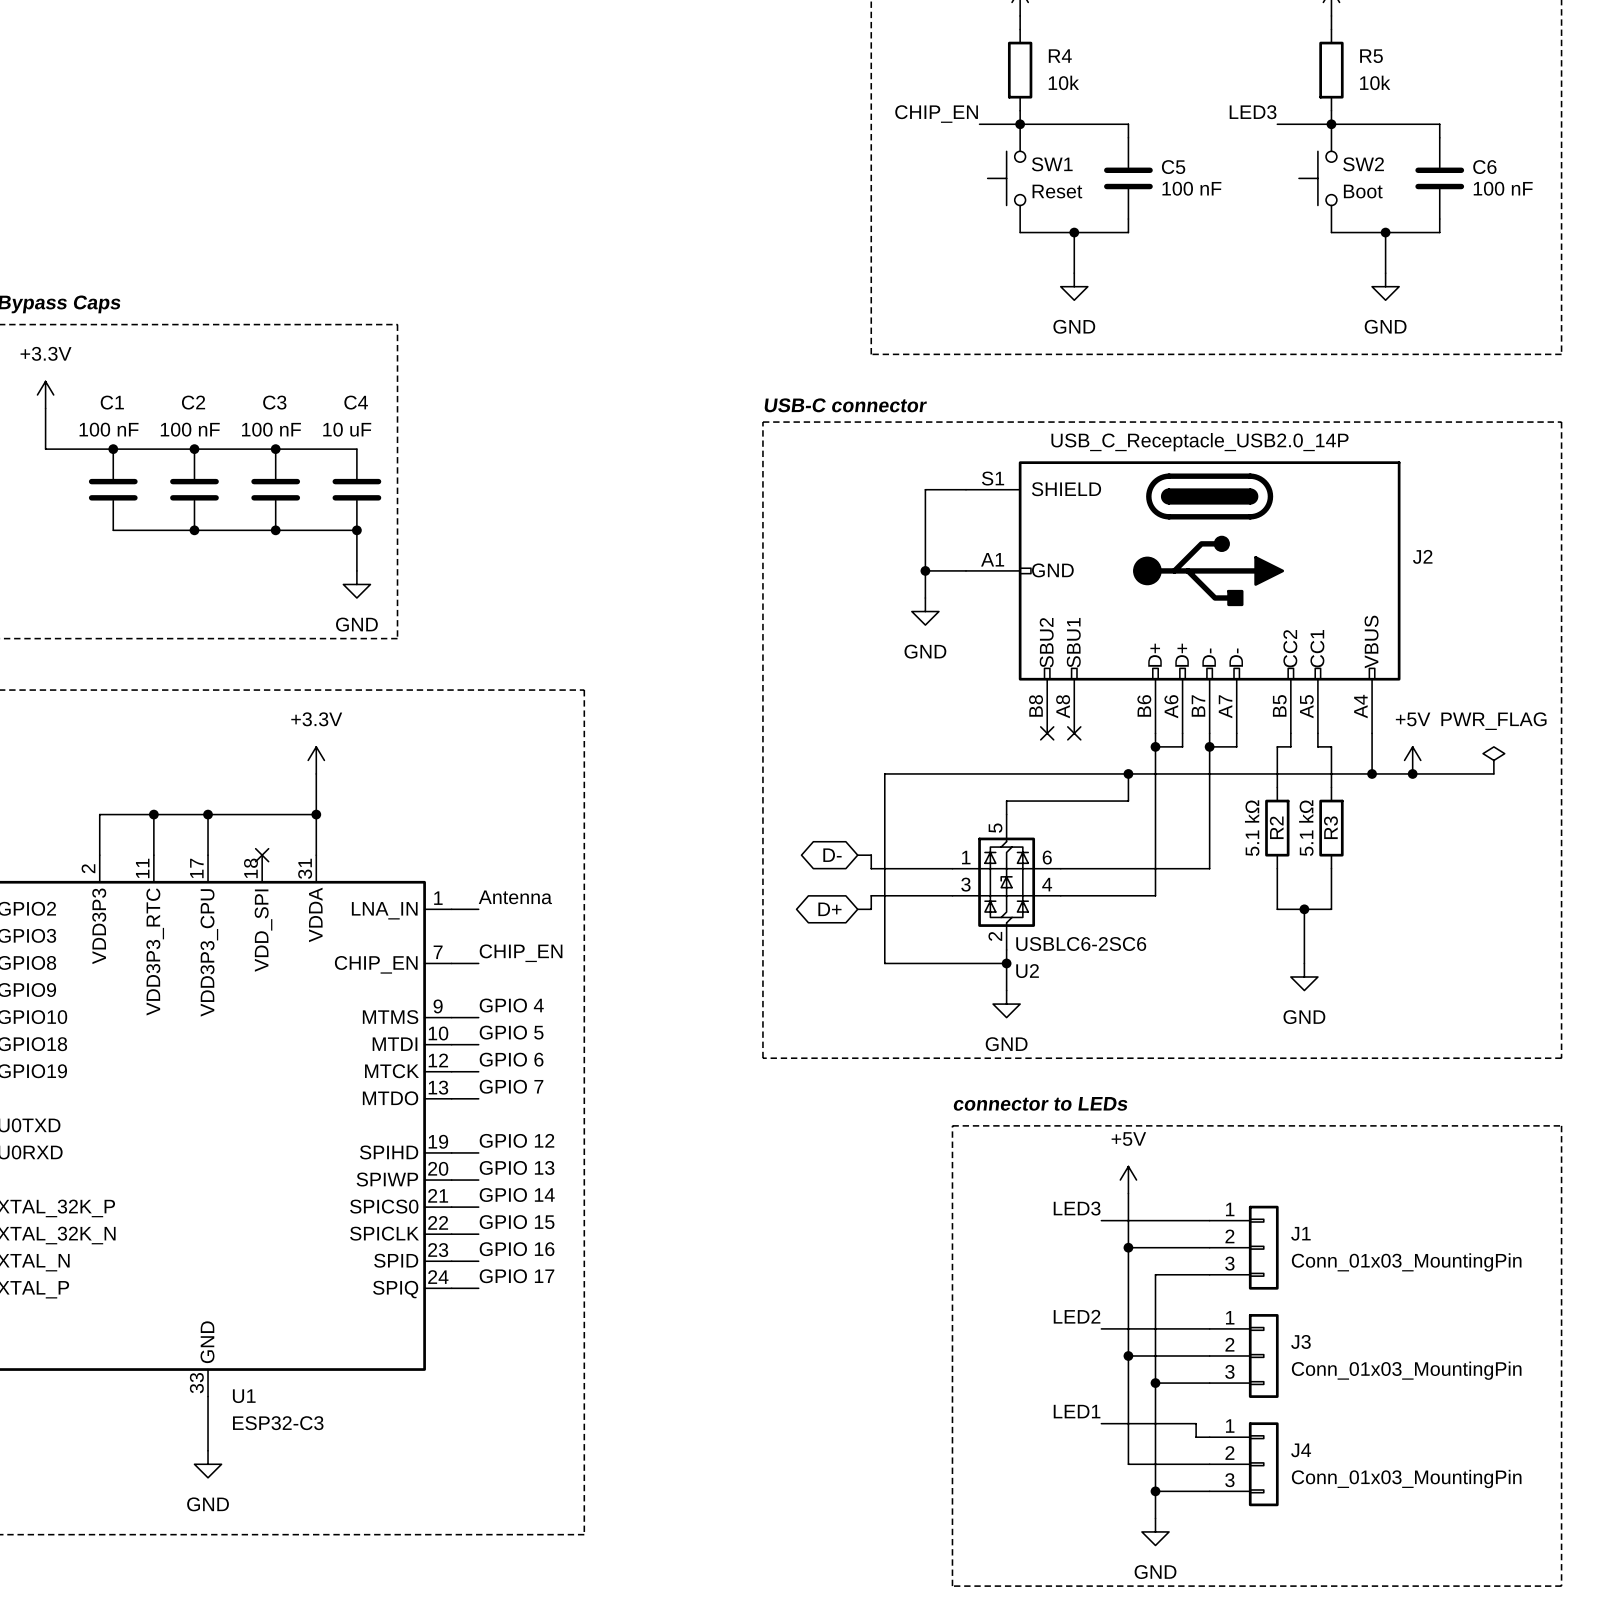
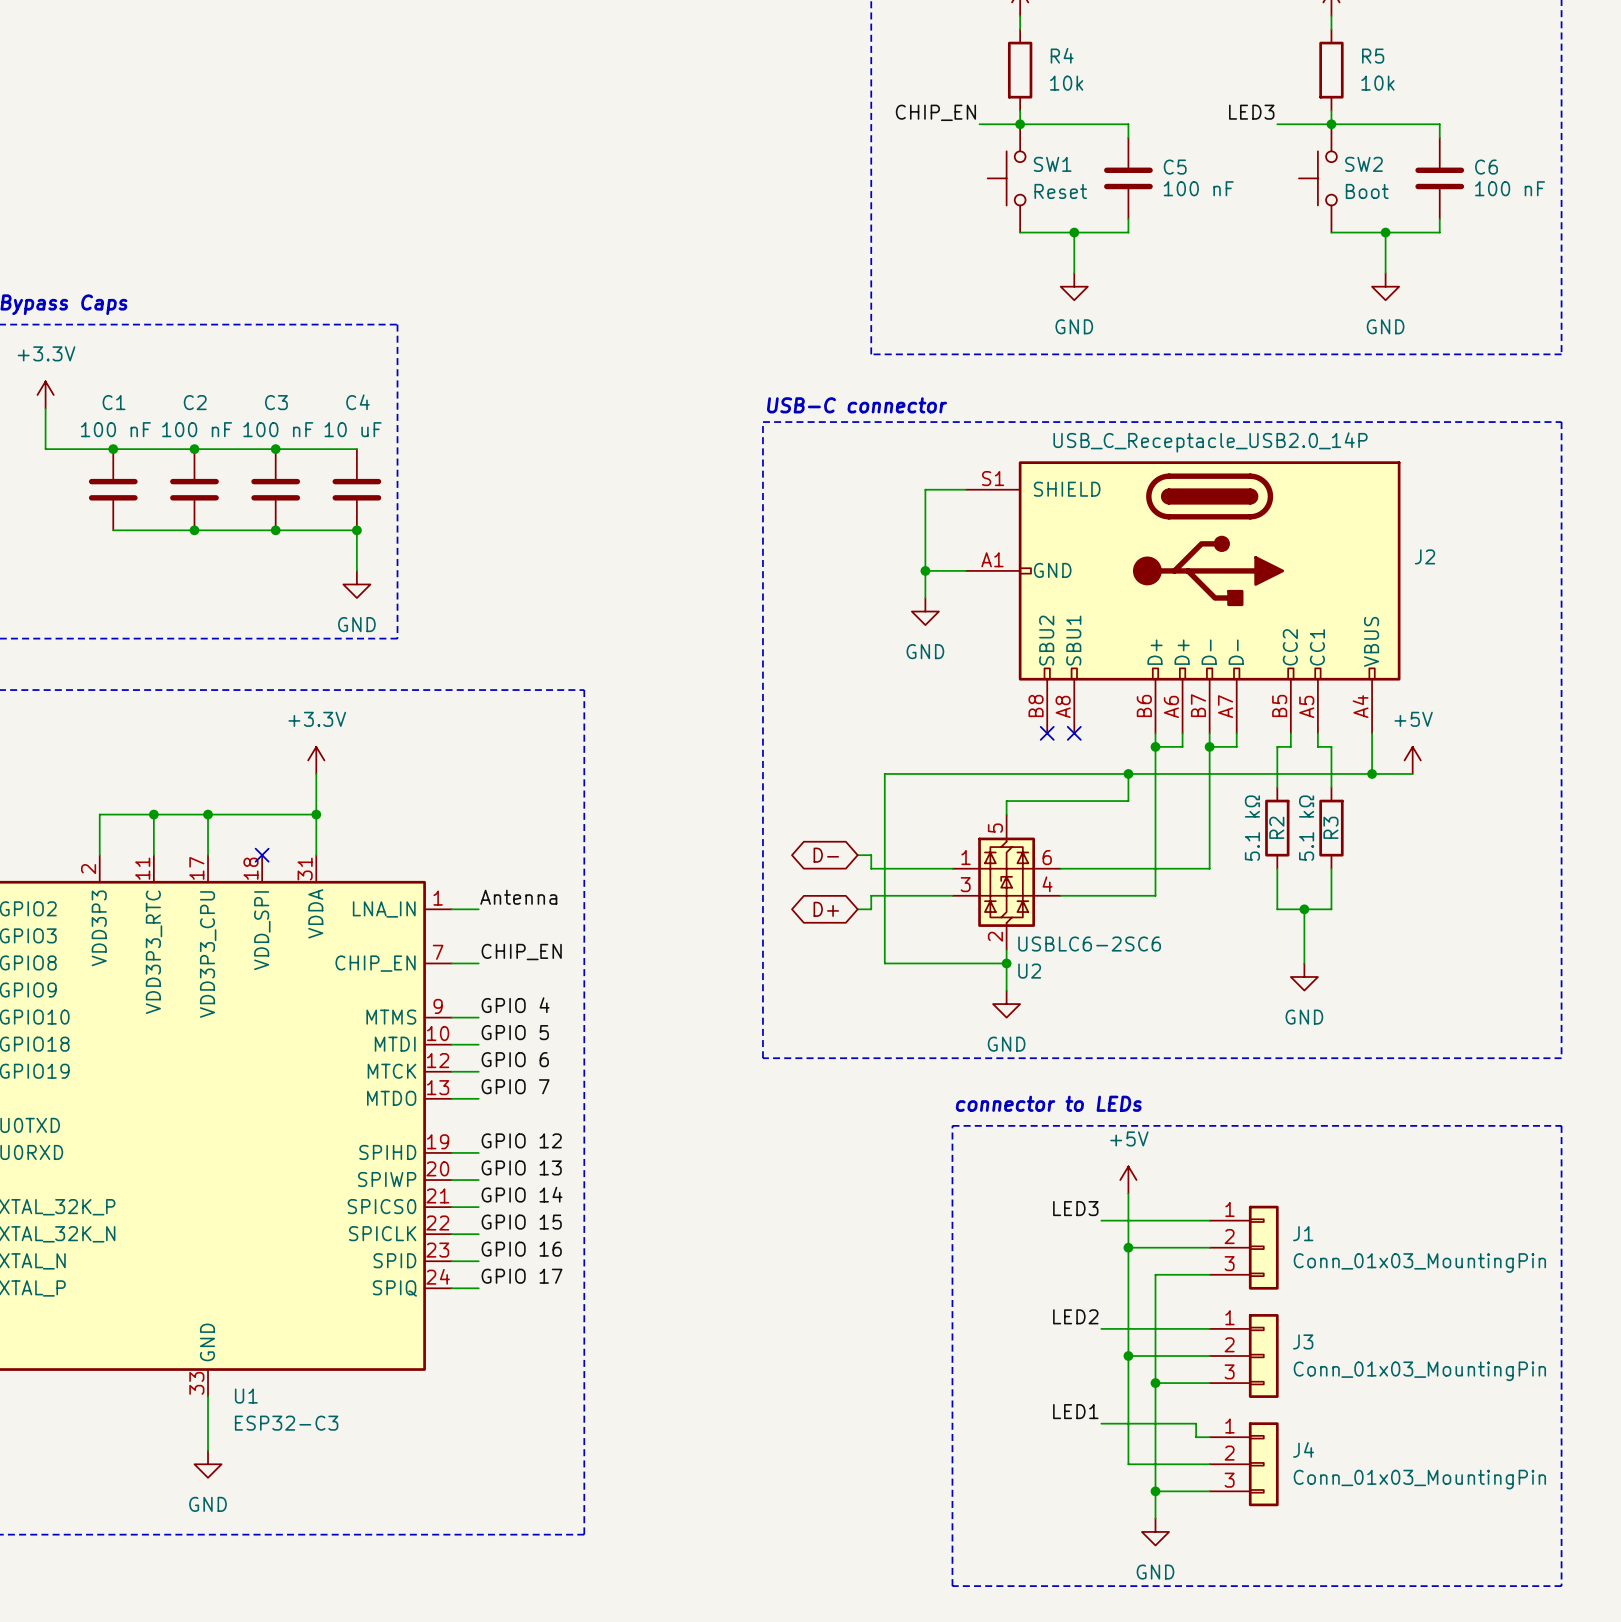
power symbol: PWR_FLAG (1493, 760) -> none
wire: (1412, 773) (1493, 773) -> none
junction: (1412, 773) -> none

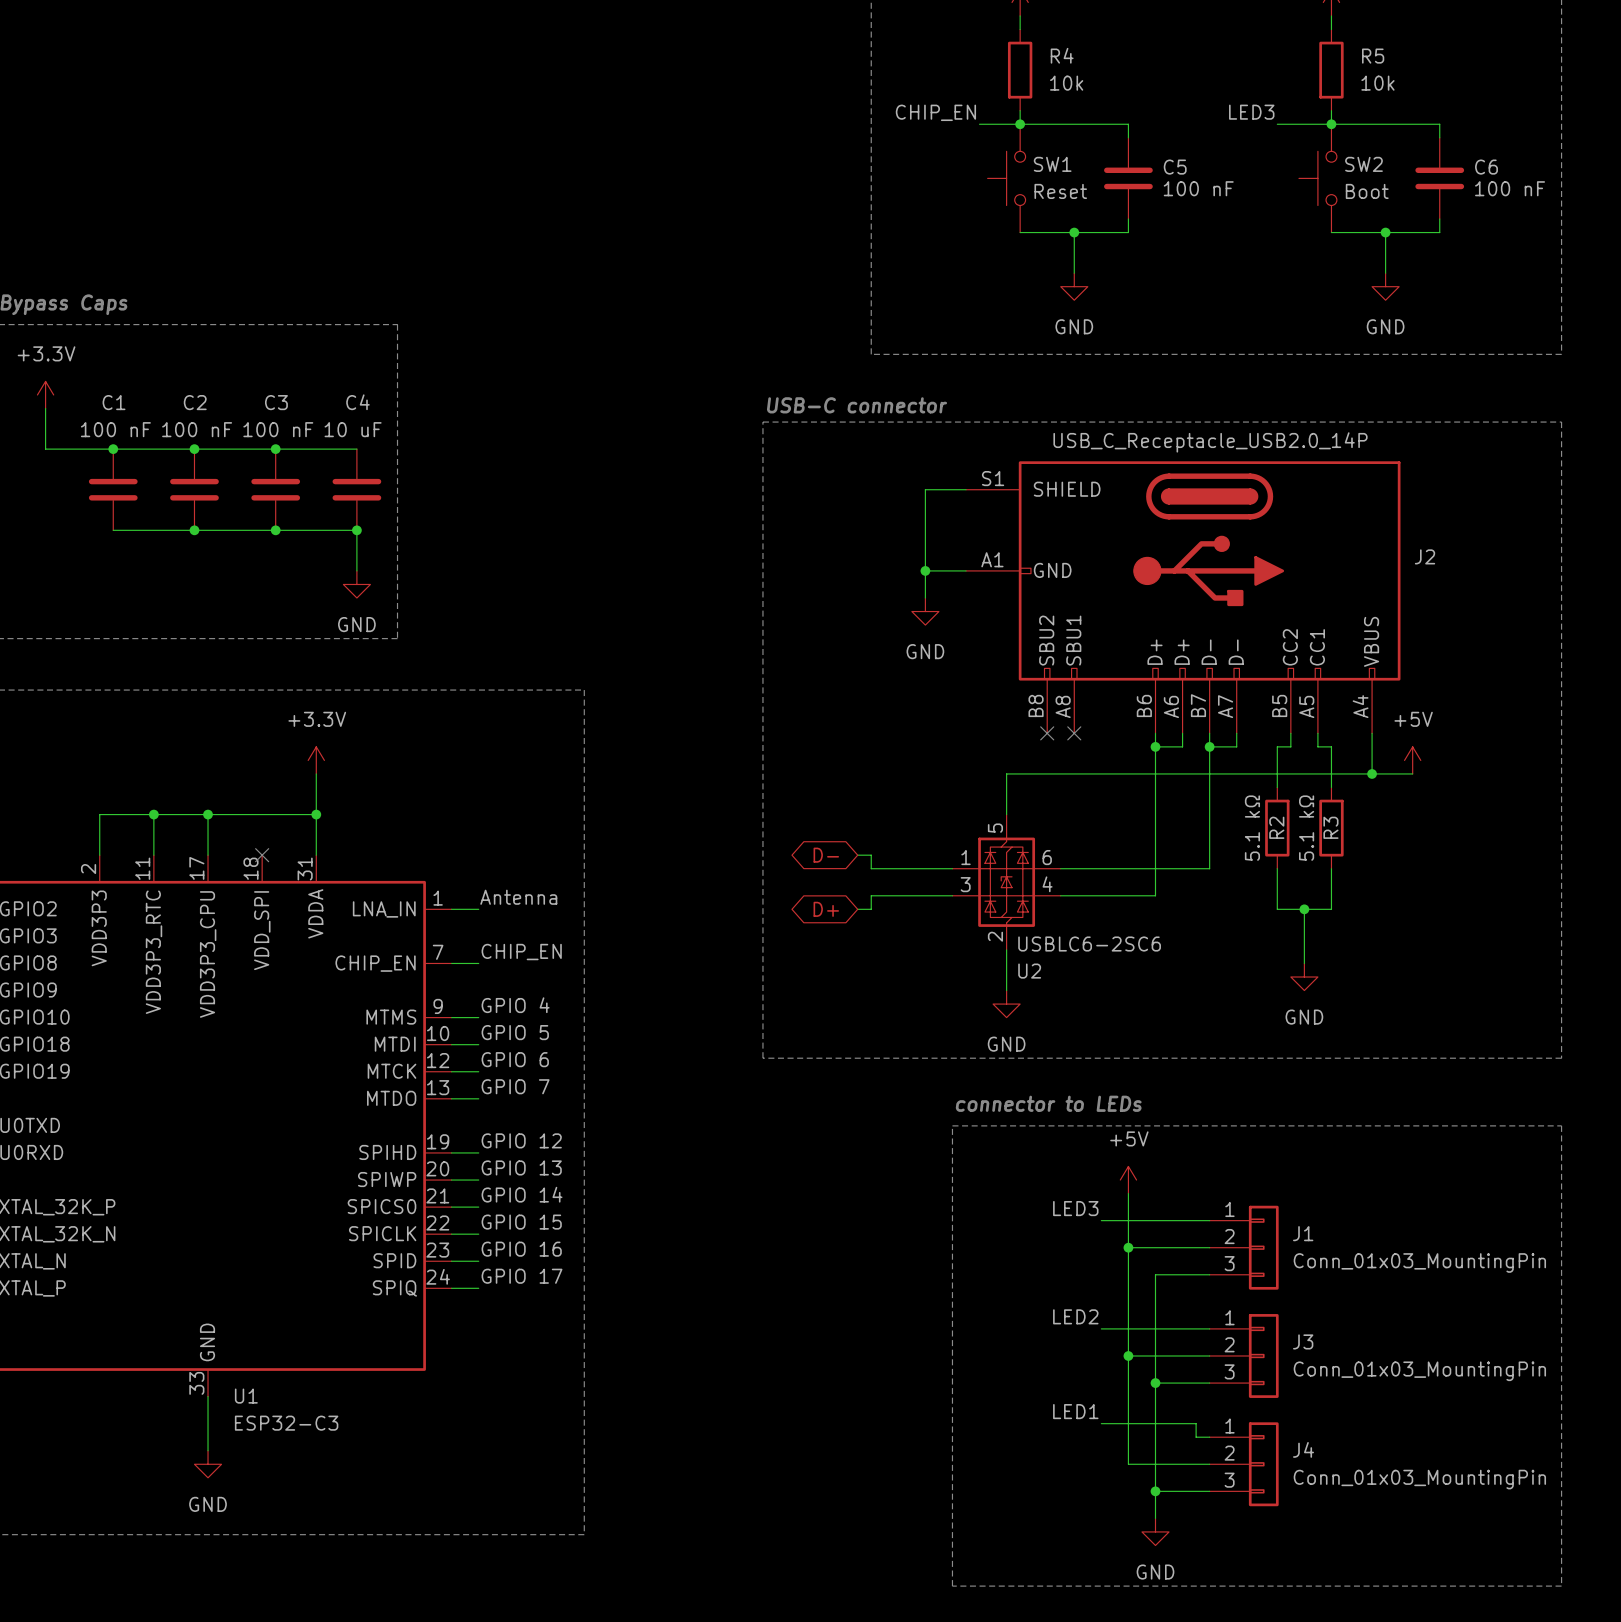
wire: (1006, 773) (884, 773) (884, 963) (1006, 963) -> none
wire: (1128, 773) (1128, 801) (1006, 801) -> (1006, 773) (1006, 801)
junction: (1128, 773) -> none
junction: (1006, 963) -> none

